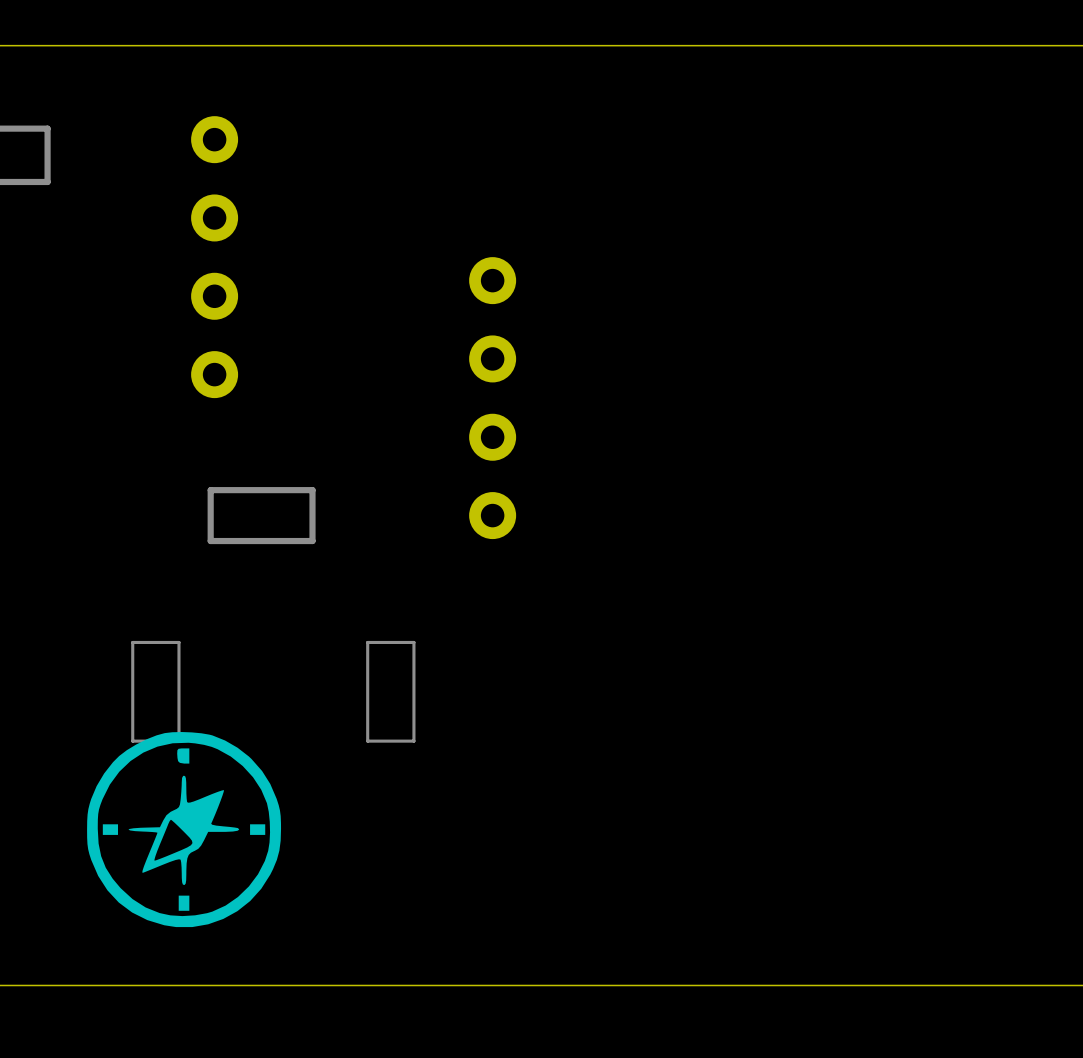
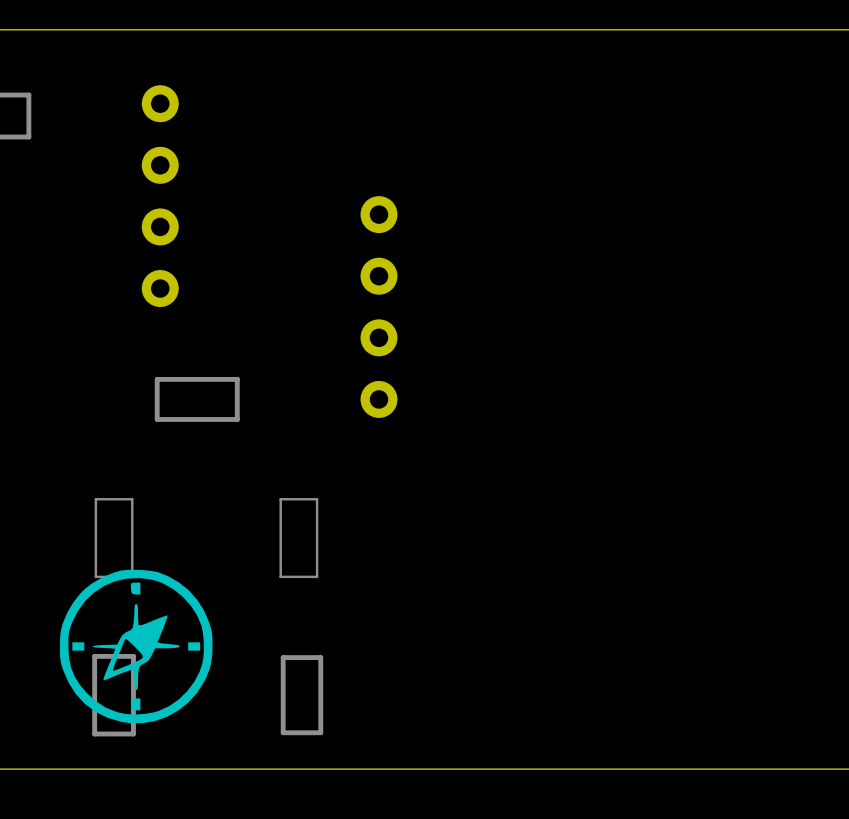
part: none -> (114, 695)
part: none -> (301, 695)

